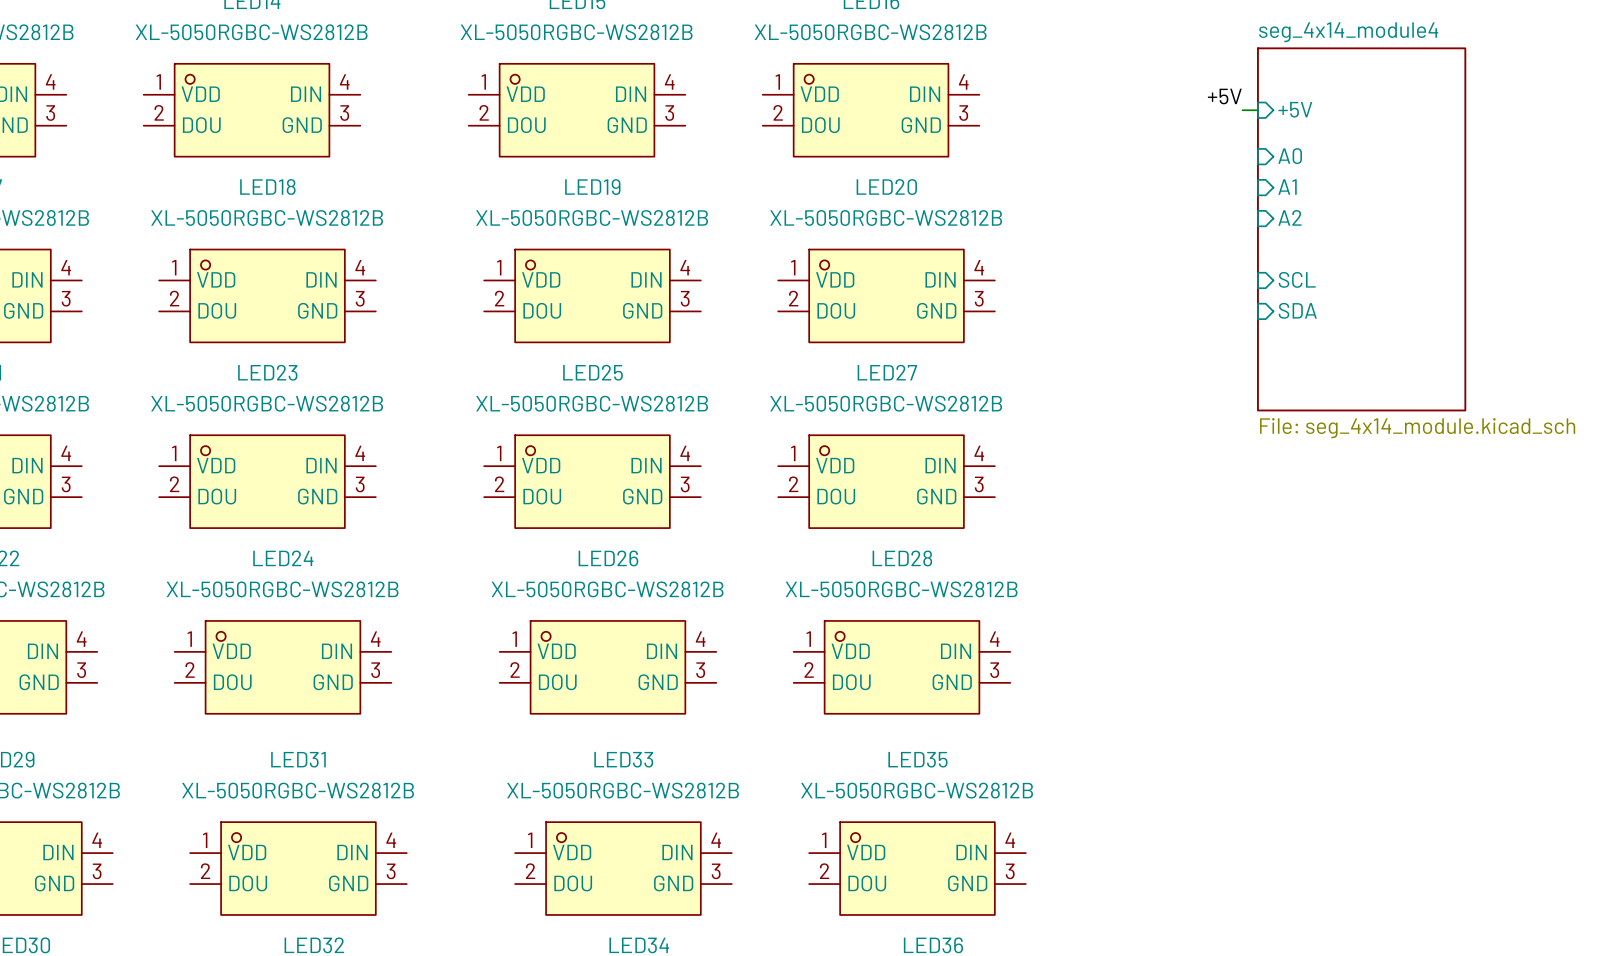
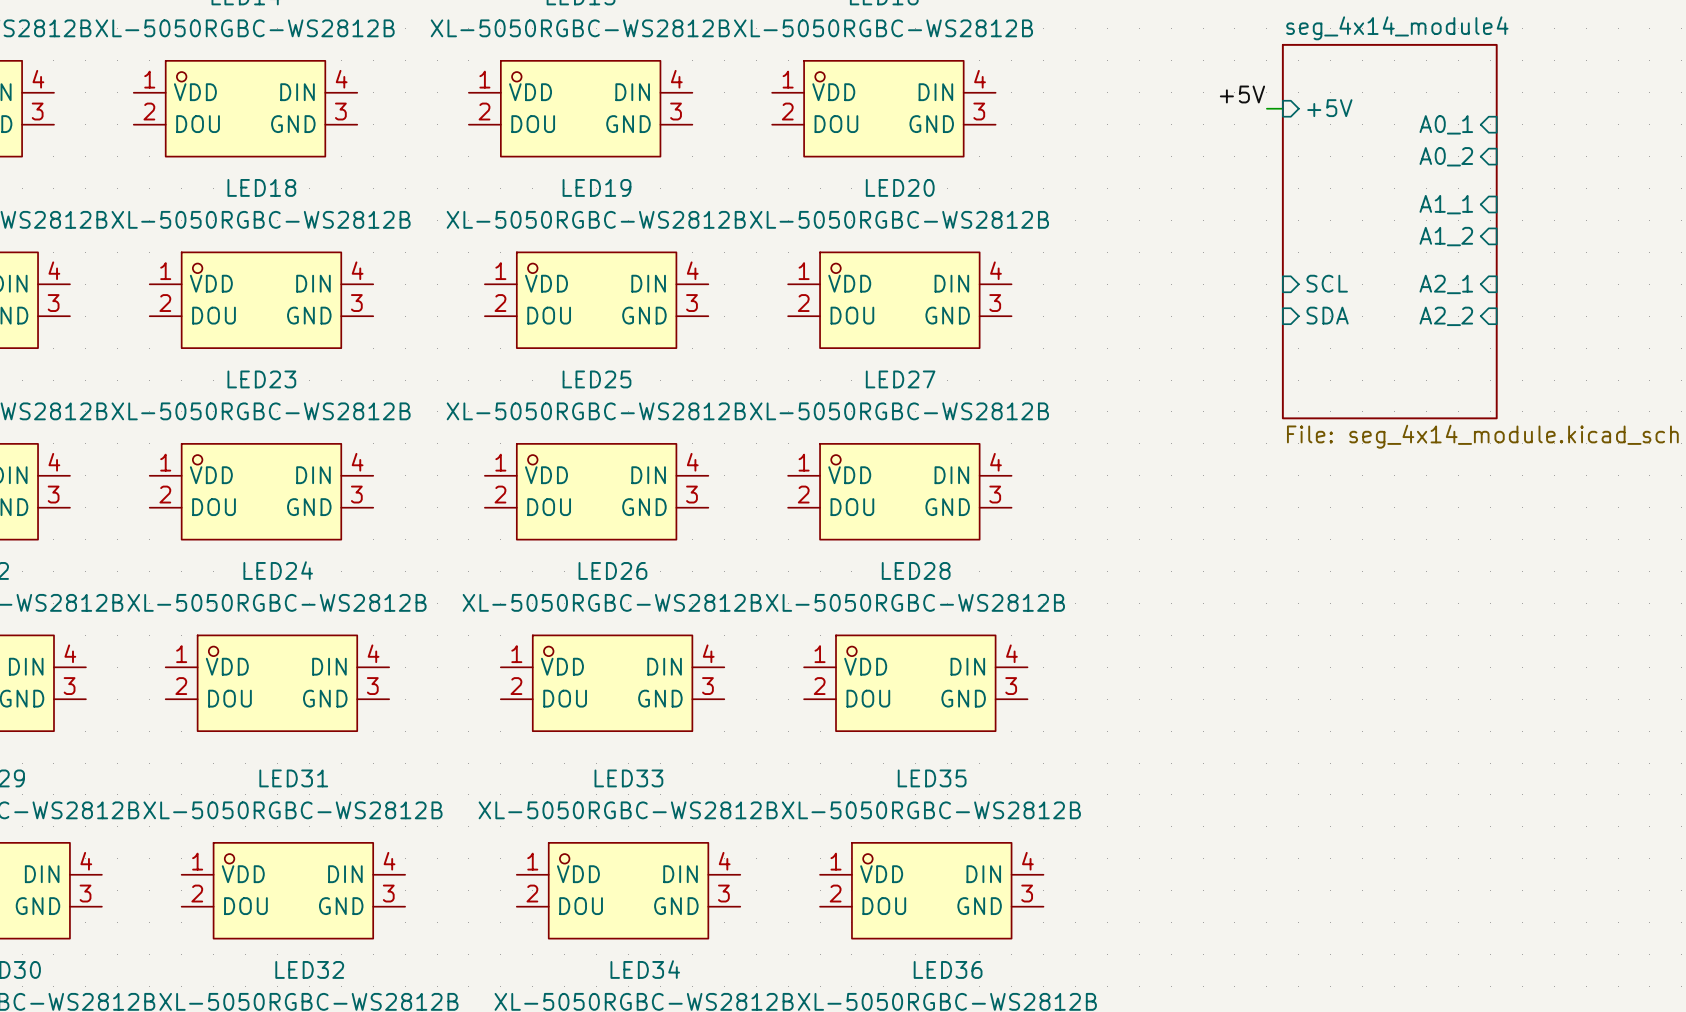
sheet pin: none -> A0_1 (1446, 124)
sheet pin: A0 (1290, 156) -> none
sheet pin: none -> A0_2 (1446, 156)
sheet pin: A1 (1287, 187) -> none
sheet pin: none -> A1_1 (1446, 204)
sheet pin: A2 (1289, 217) -> none
sheet pin: none -> A1_2 (1446, 236)
sheet pin: none -> A2_1 (1446, 284)
sheet pin: none -> A2_2 (1446, 316)

